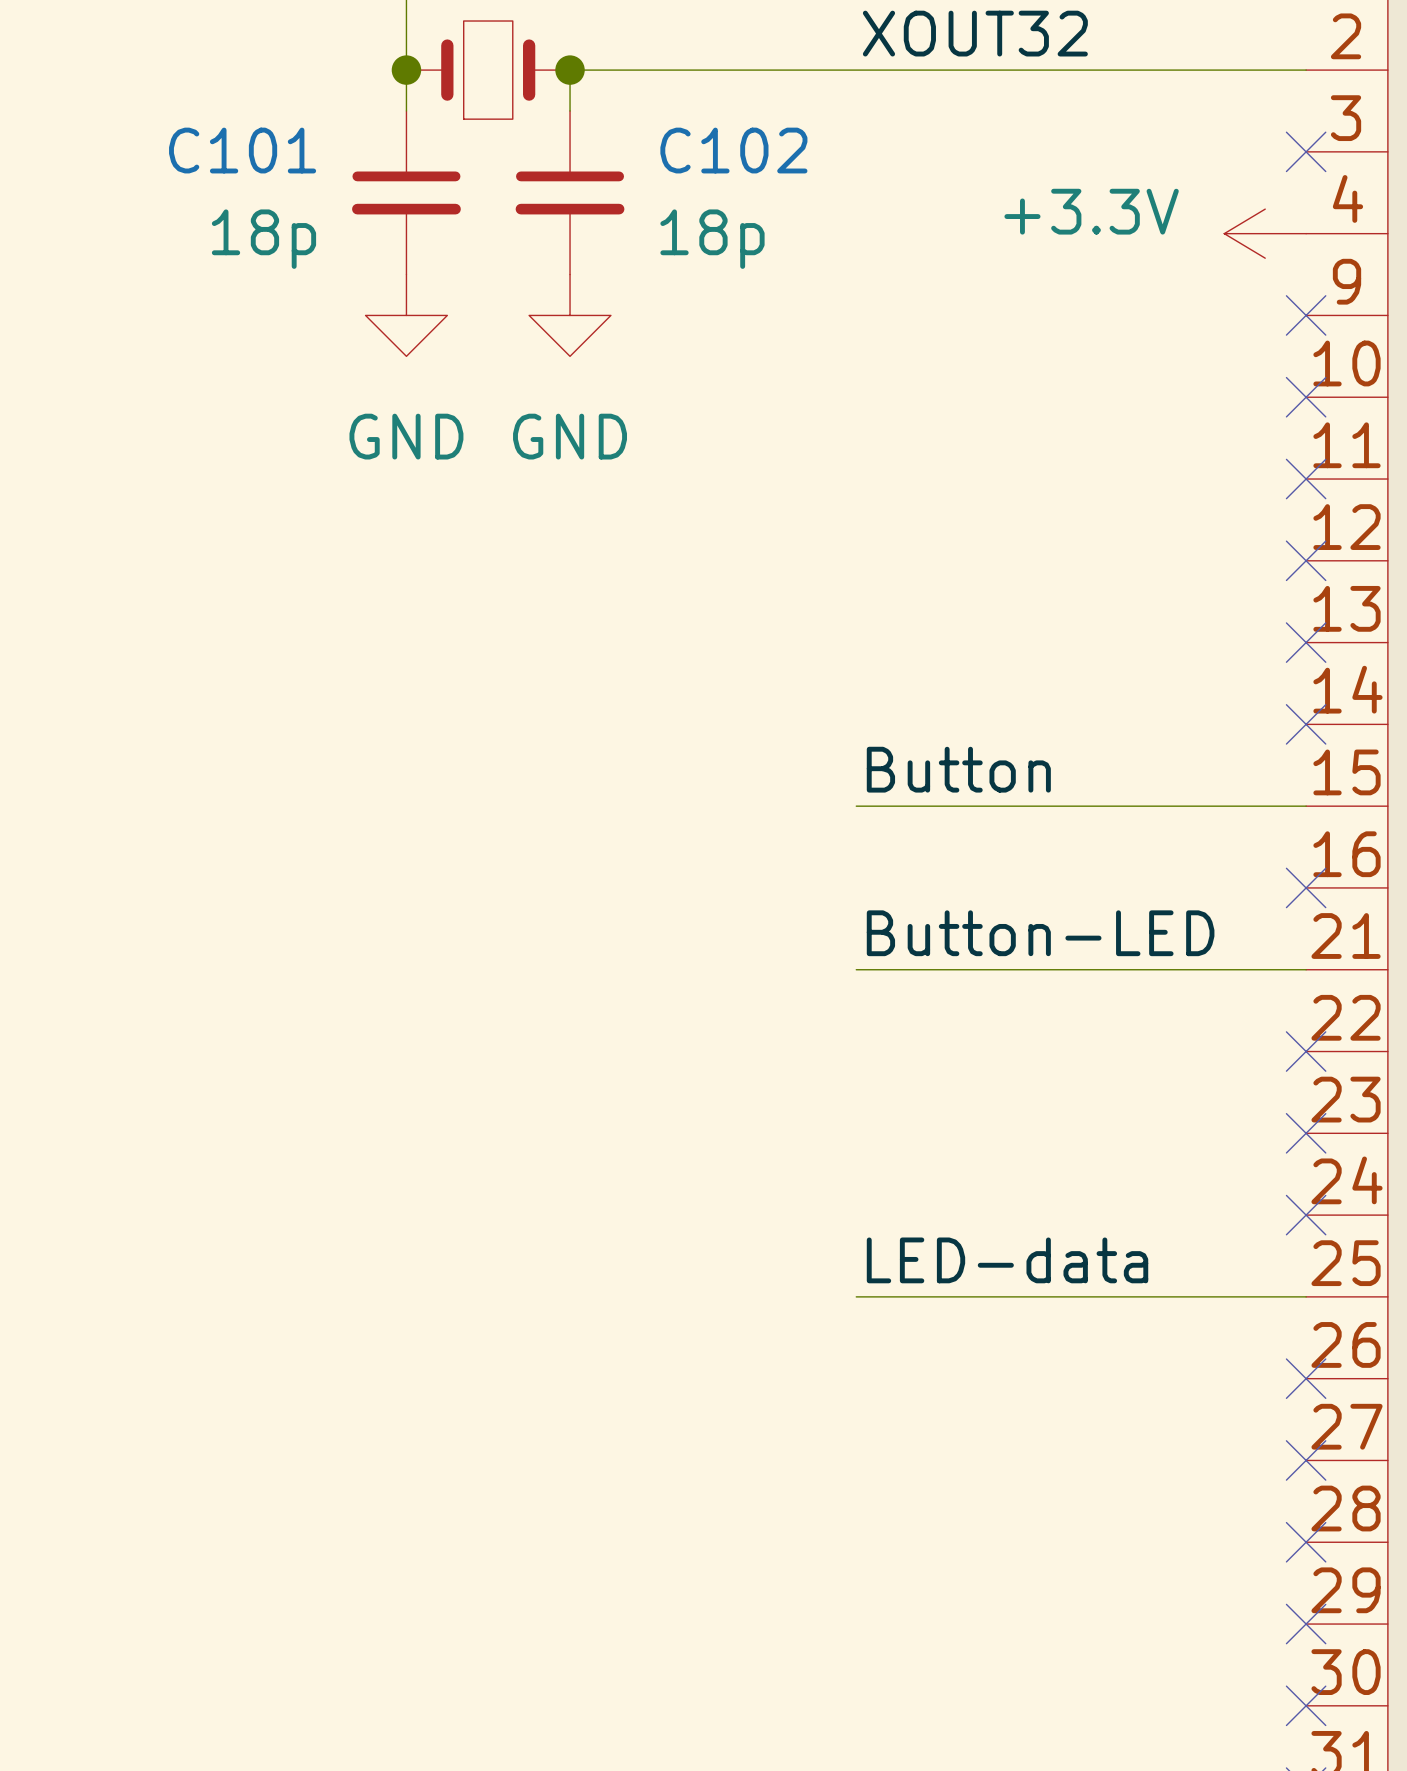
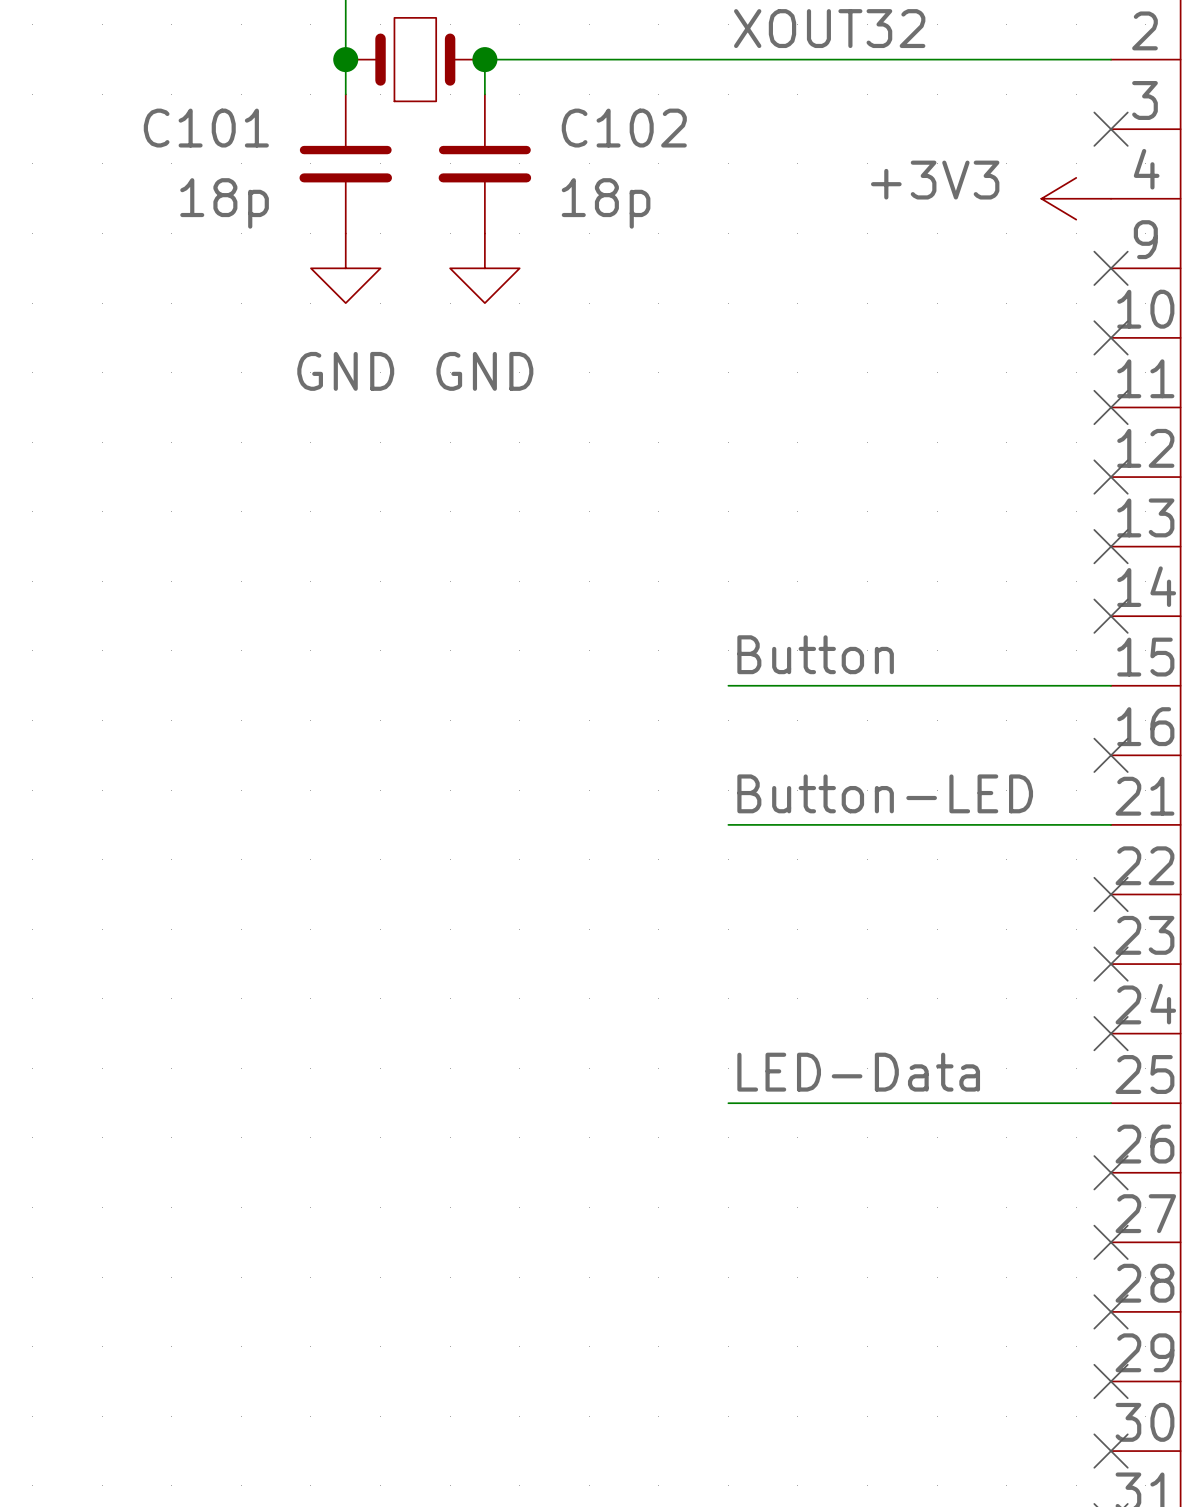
power symbol: +3.3V (1265, 233) -> +3V3 (1076, 198)
label: LED-data (1007, 1260) -> LED-Data (858, 1072)

